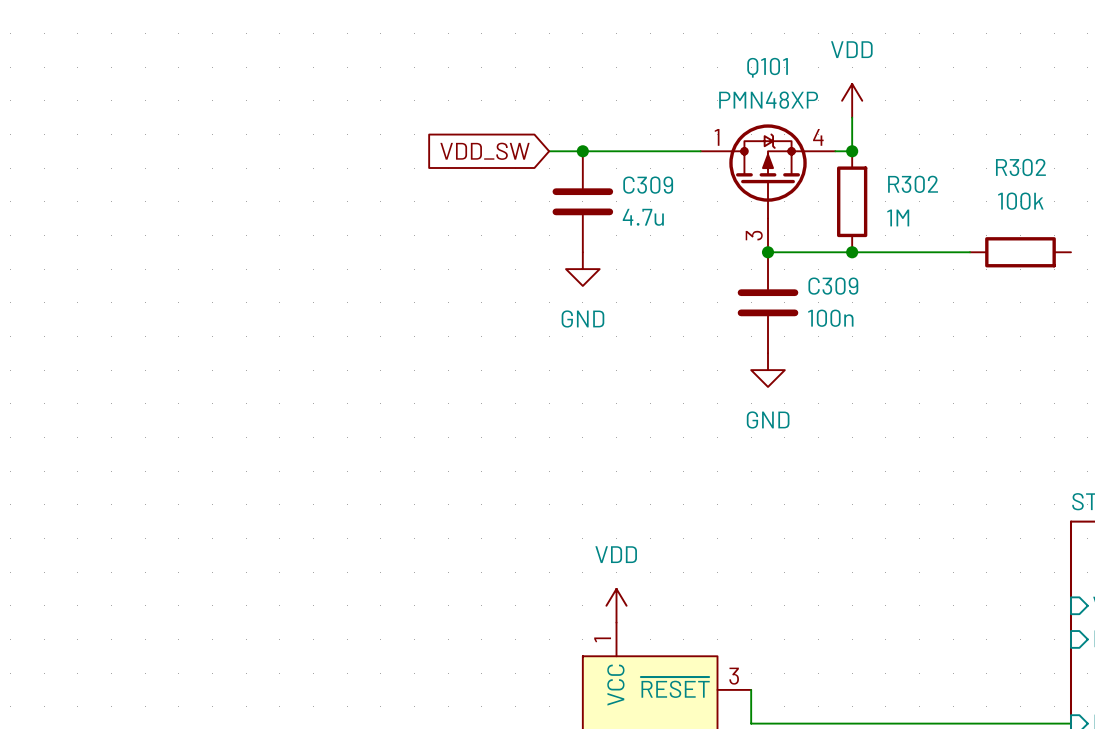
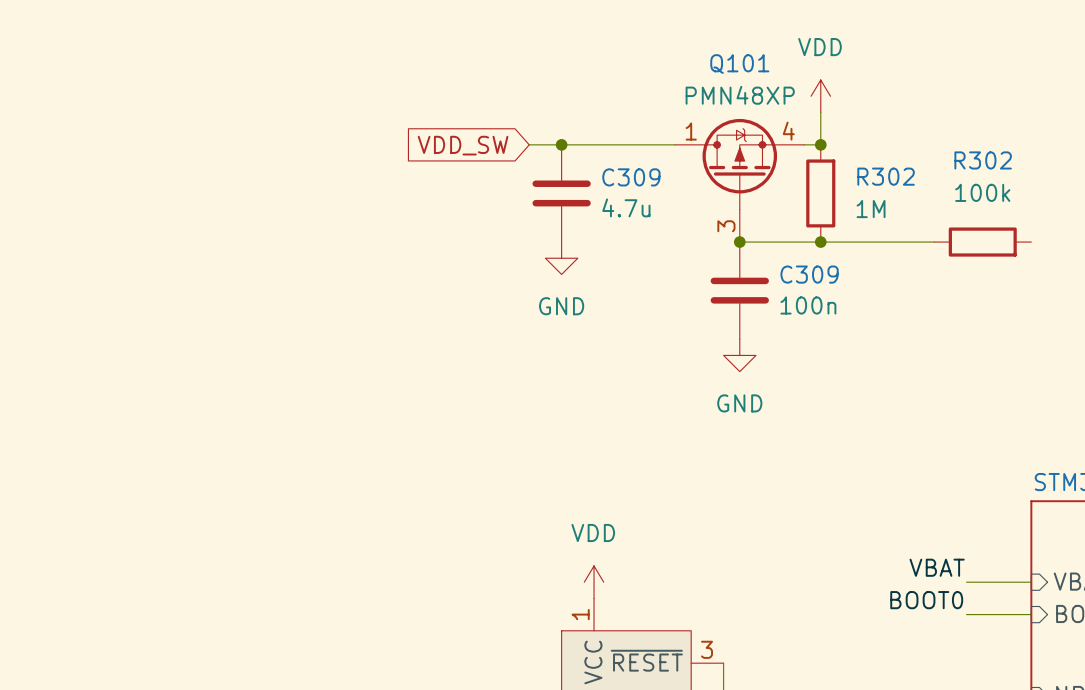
label: none -> VBAT (937, 567)
wire: none -> (966, 582) (1031, 582)
label: none -> BOOT0 (926, 600)
wire: none -> (966, 614) (1031, 614)

